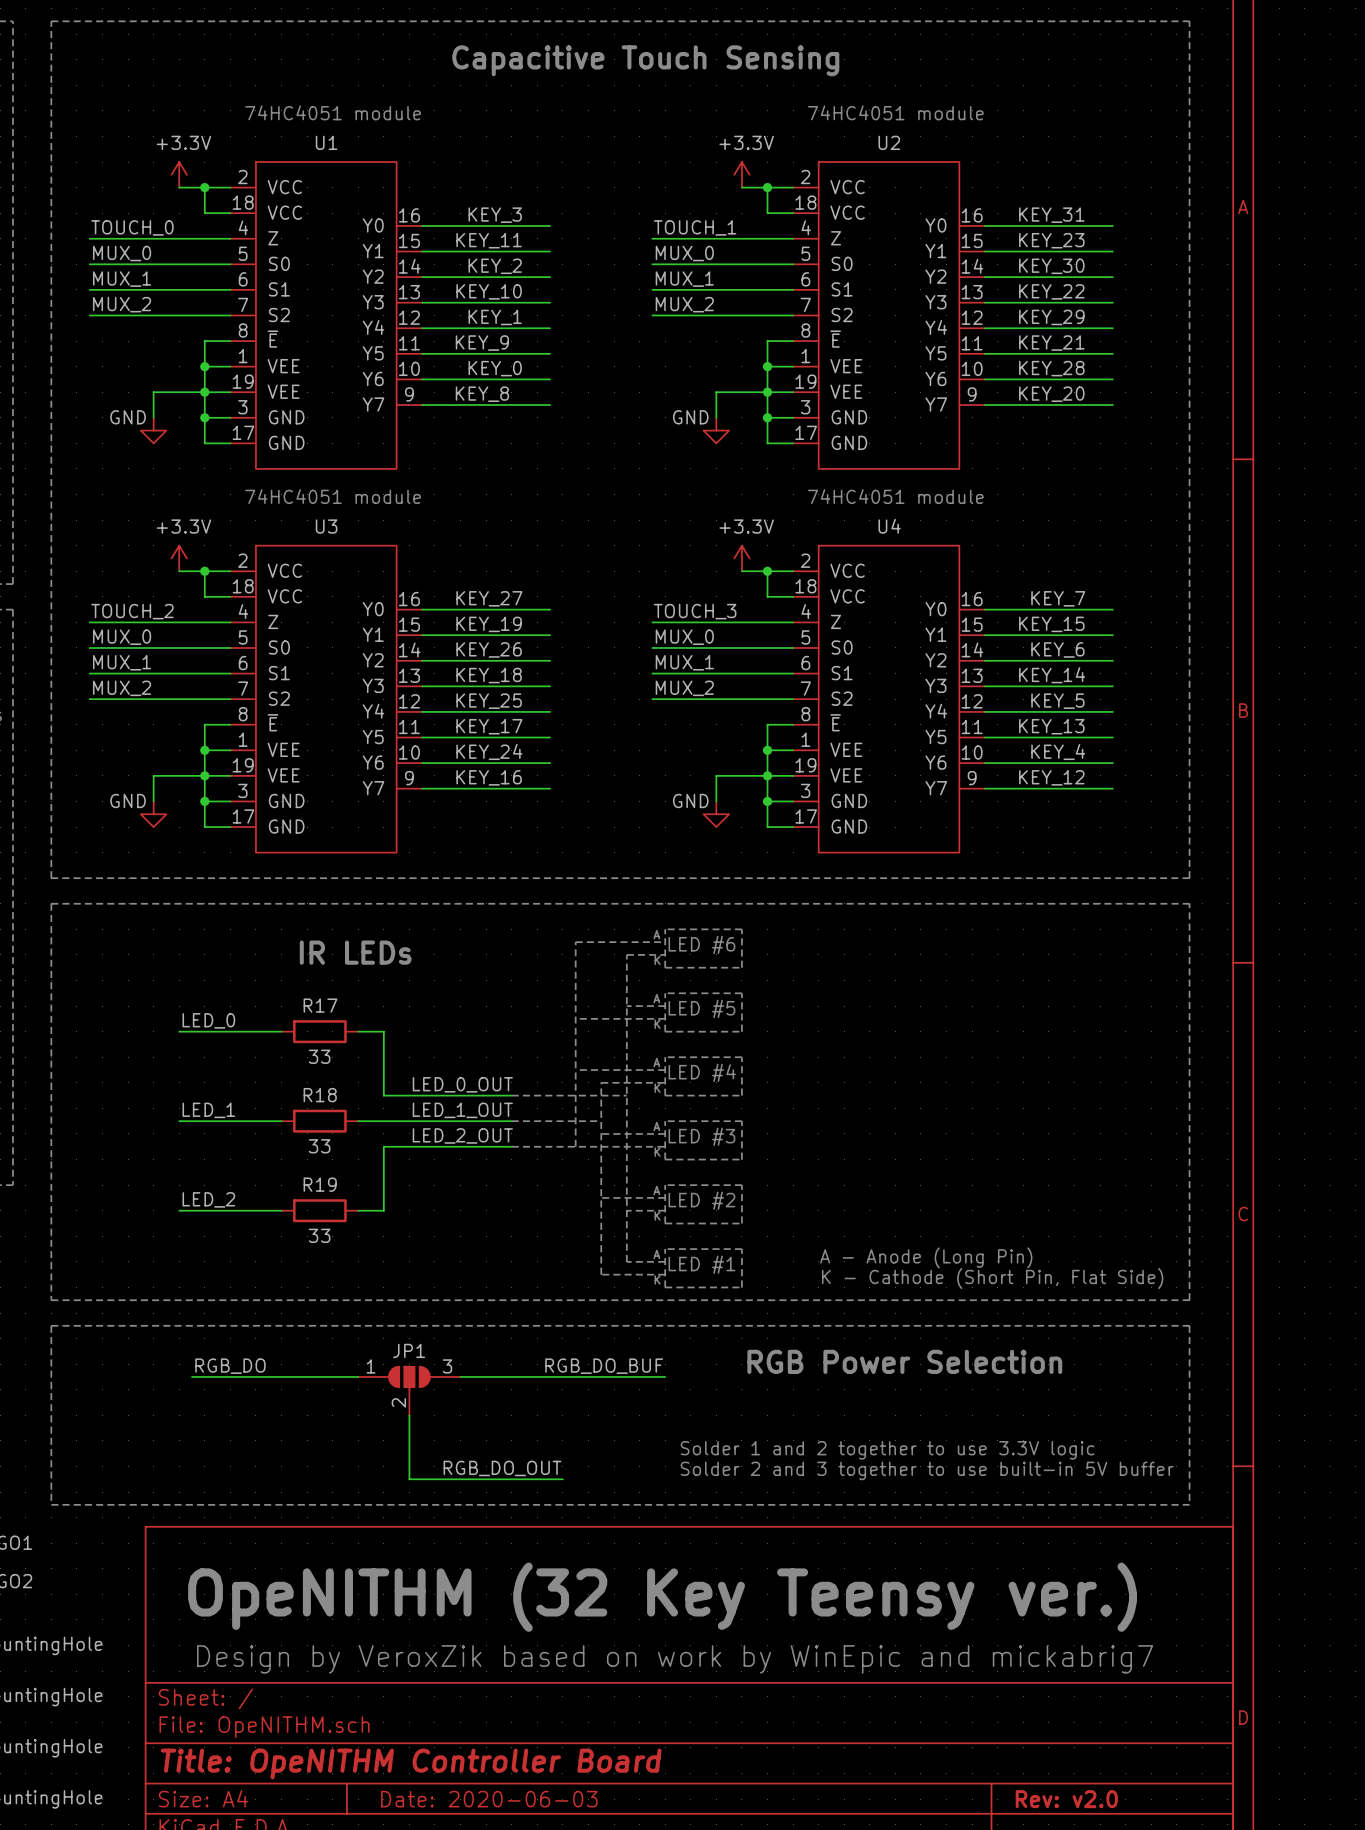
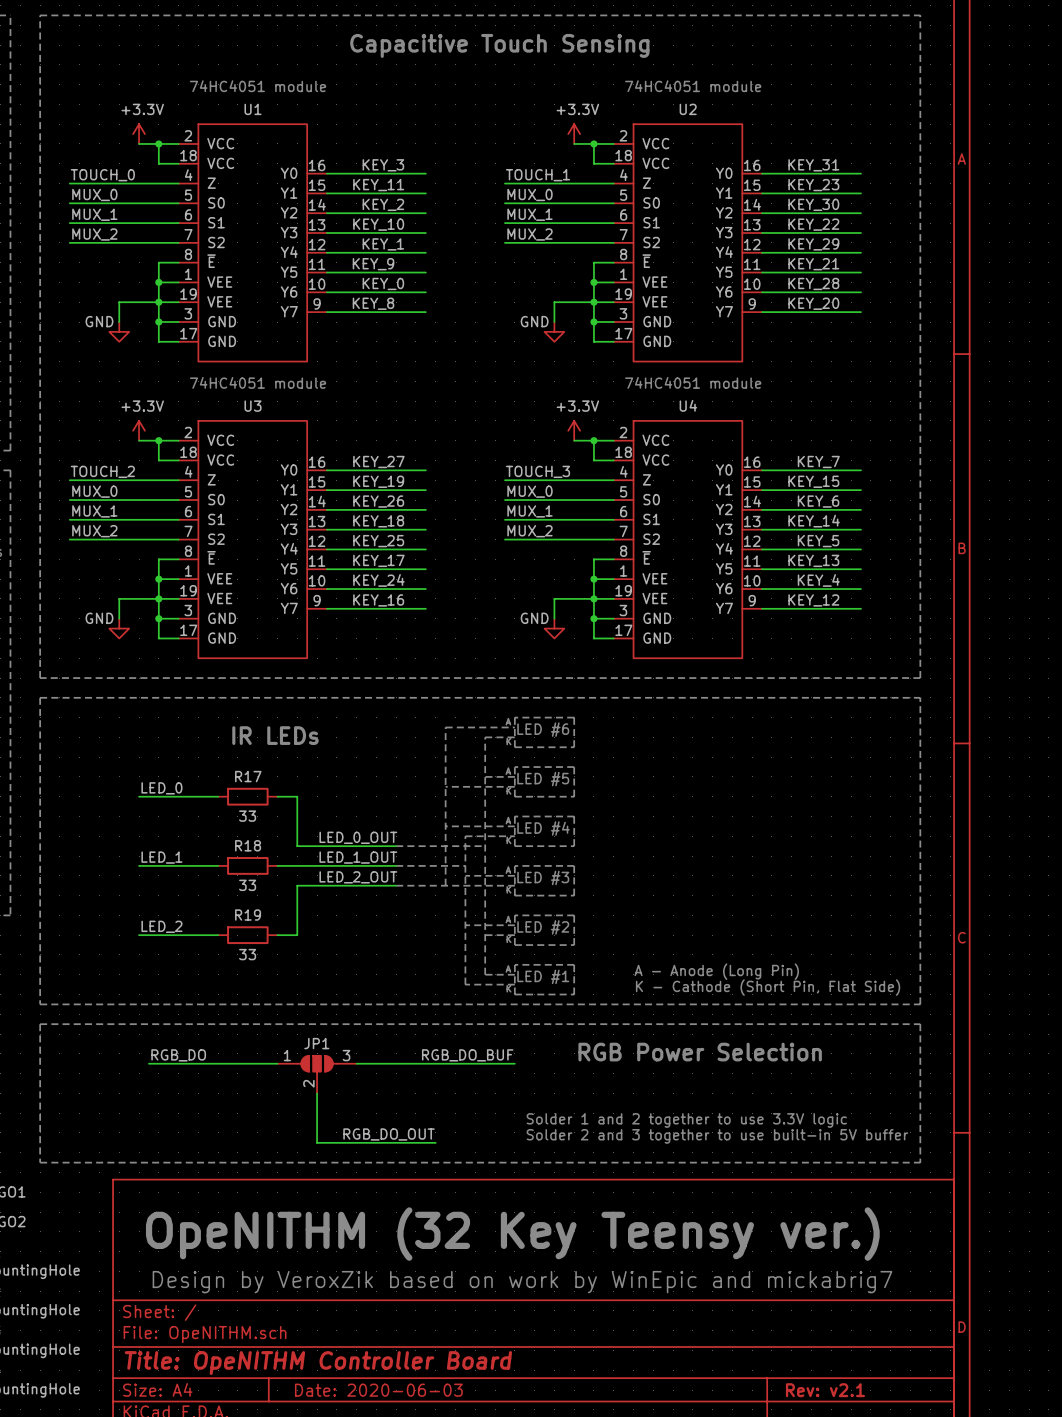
title block: Rev: v2.0 (1066, 1799) -> Rev: v2.1 (825, 1390)

